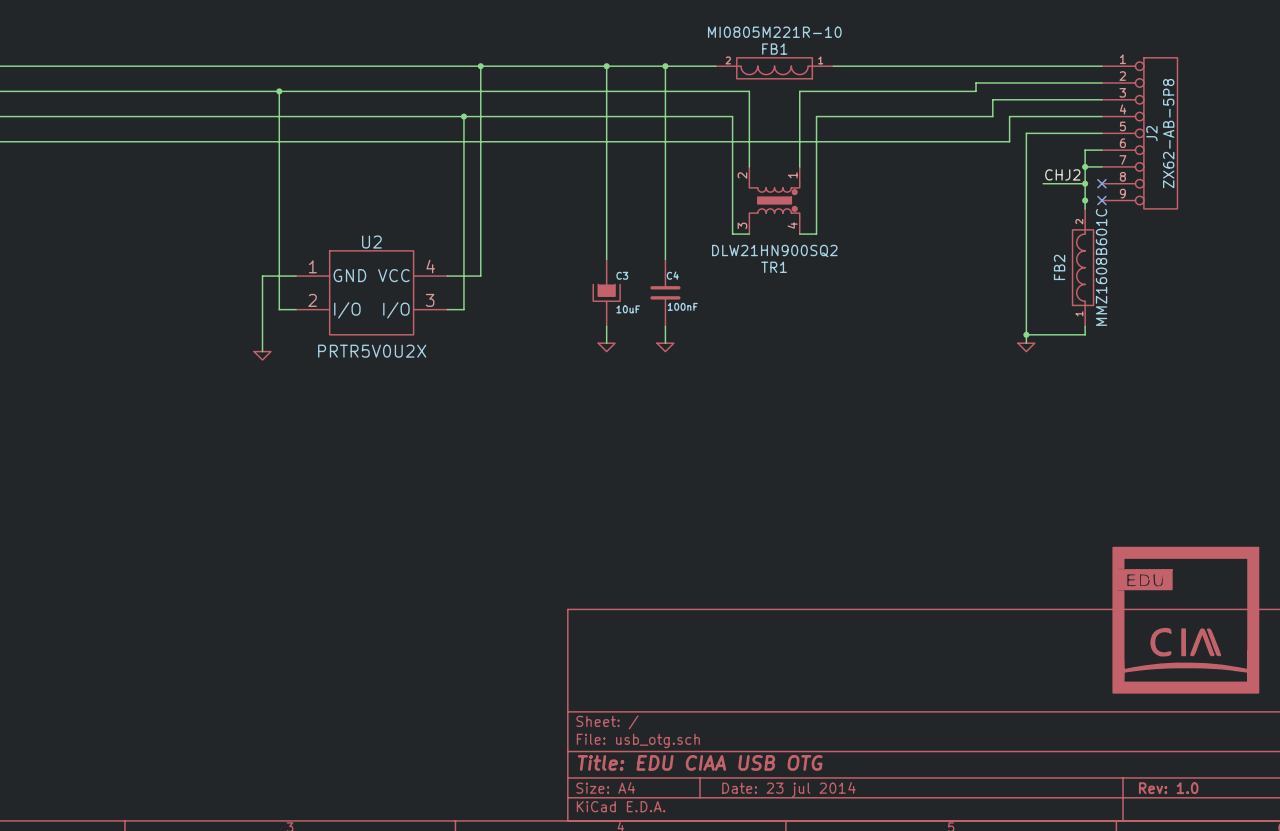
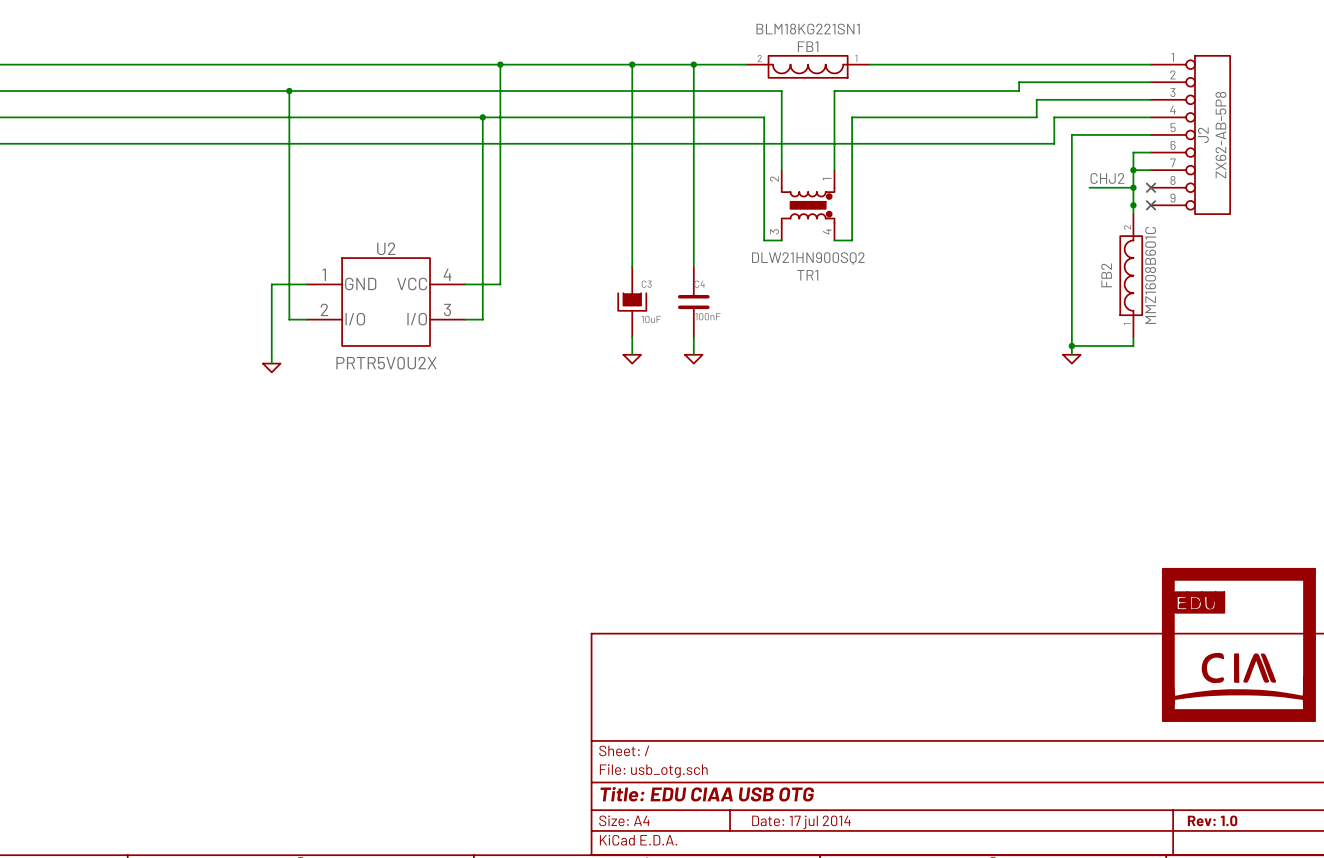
FB1 value: MI0805M221R-10 (774, 32) -> BLM18KG221SN1 (808, 29)
title block: Date: 23 jul 2014 (788, 789) -> Date: 17 jul 2014 (801, 822)

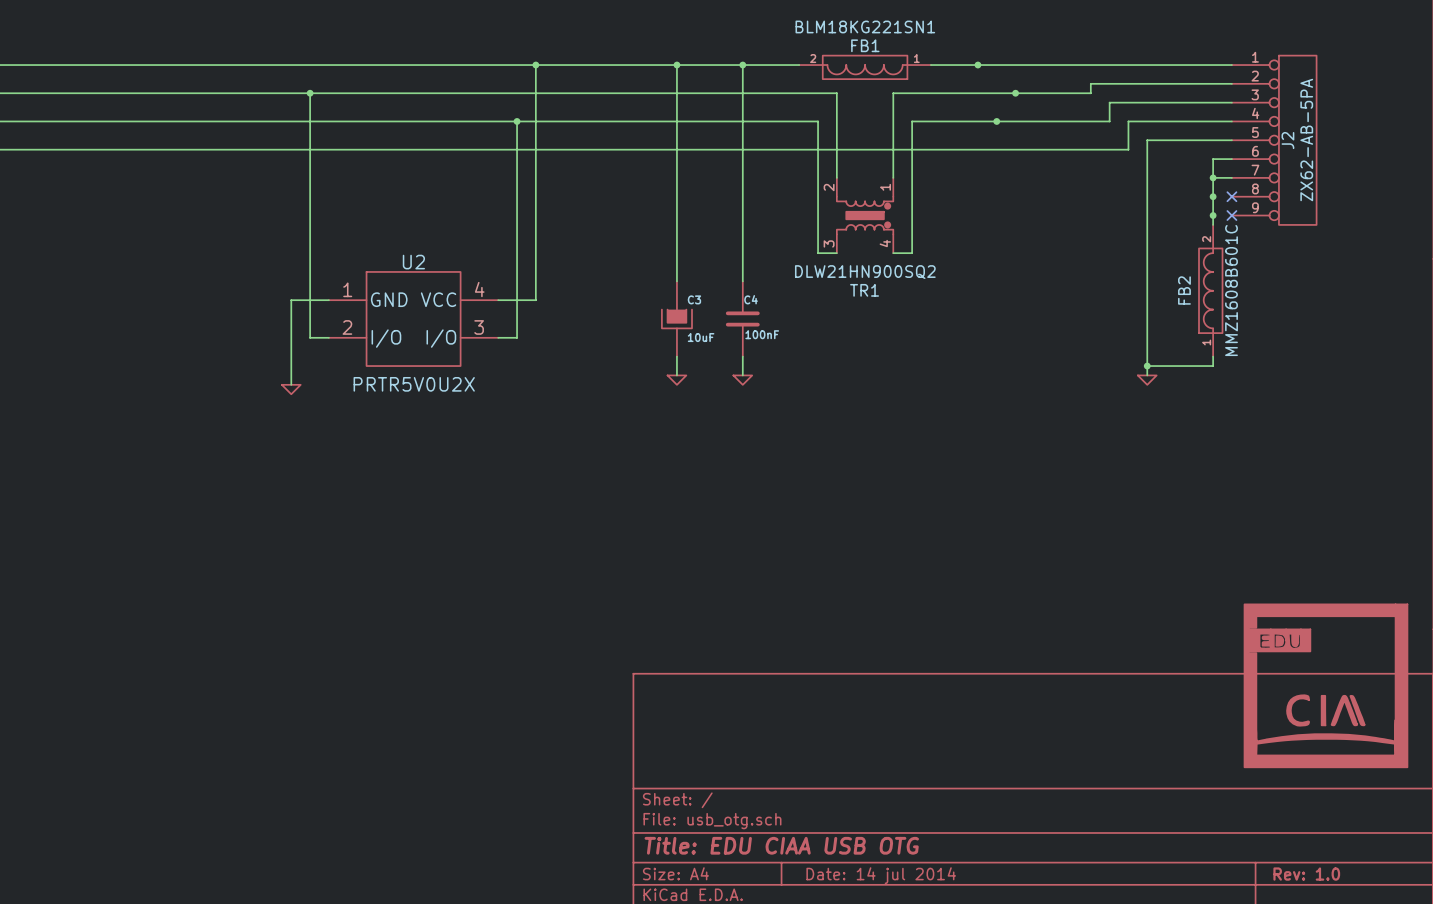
junction: none -> (977, 65)
junction: none -> (1015, 93)
junction: none -> (996, 121)
J2 value: ZX62-AB-5P8 (1220, 135) -> ZX62-AB-5PA (1306, 140)
label: CHJ2 (1107, 178) -> none
wire: (1089, 187) (1133, 187) -> none
title block: Date: 17 jul 2014 (801, 822) -> Date: 14 jul 2014 (881, 875)

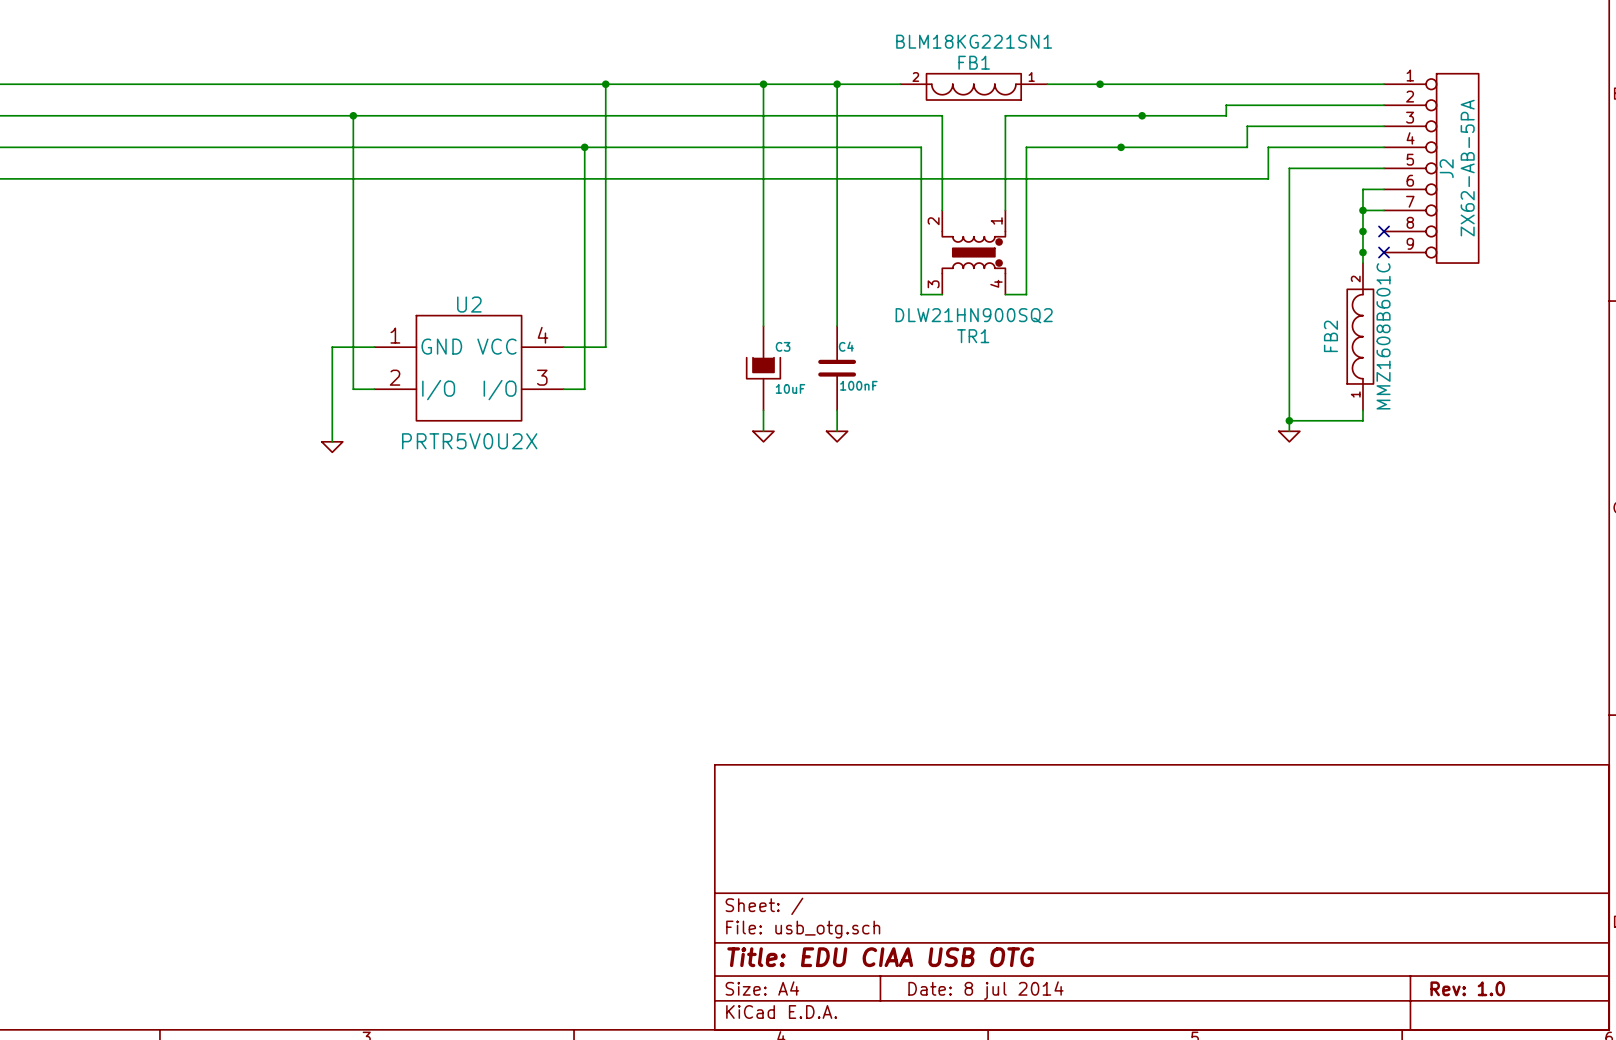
power symbol: (1325, 685) -> none
title block: Date: 14 jul 2014 (881, 875) -> Date: 8 jul 2014 (985, 990)

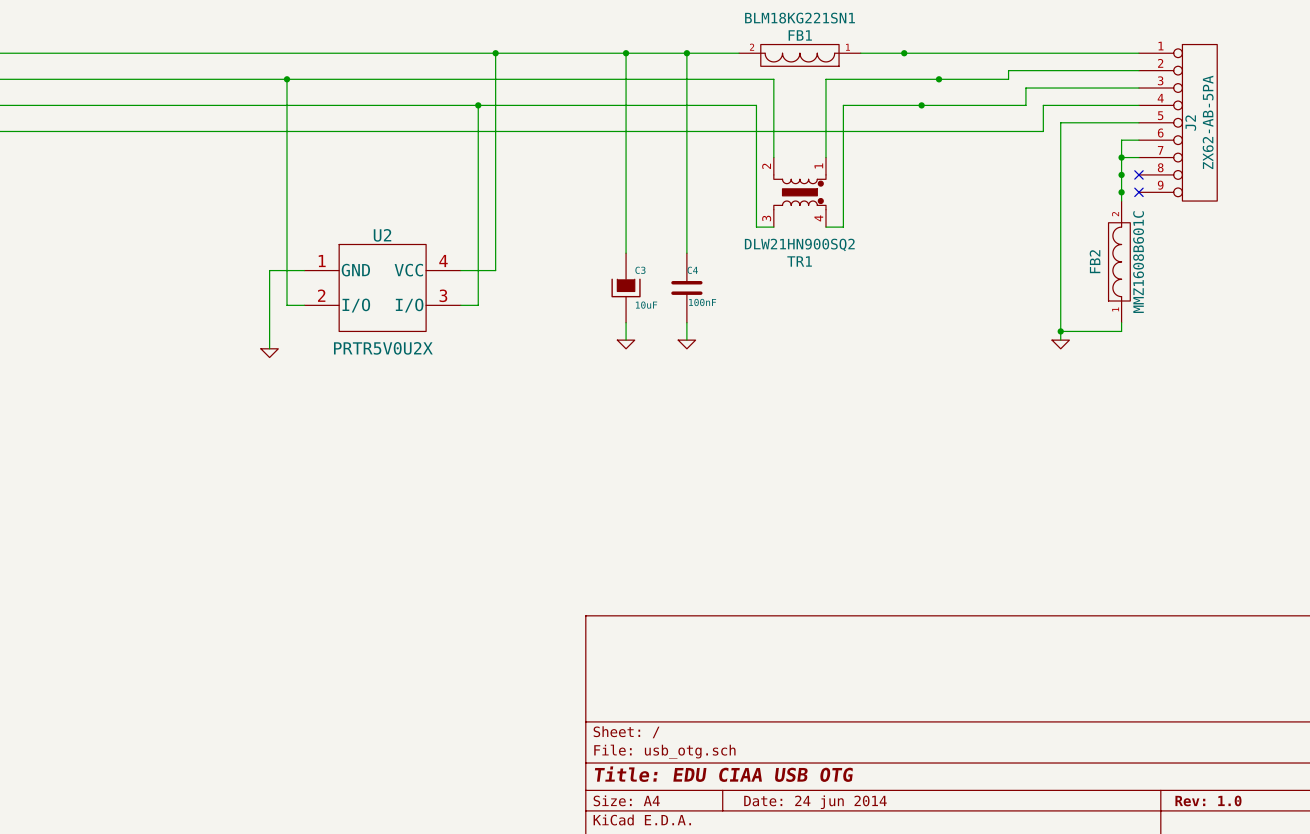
title block: Date: 8 jul 2014 (985, 990) -> Date: 24 jun 2014 (815, 802)

